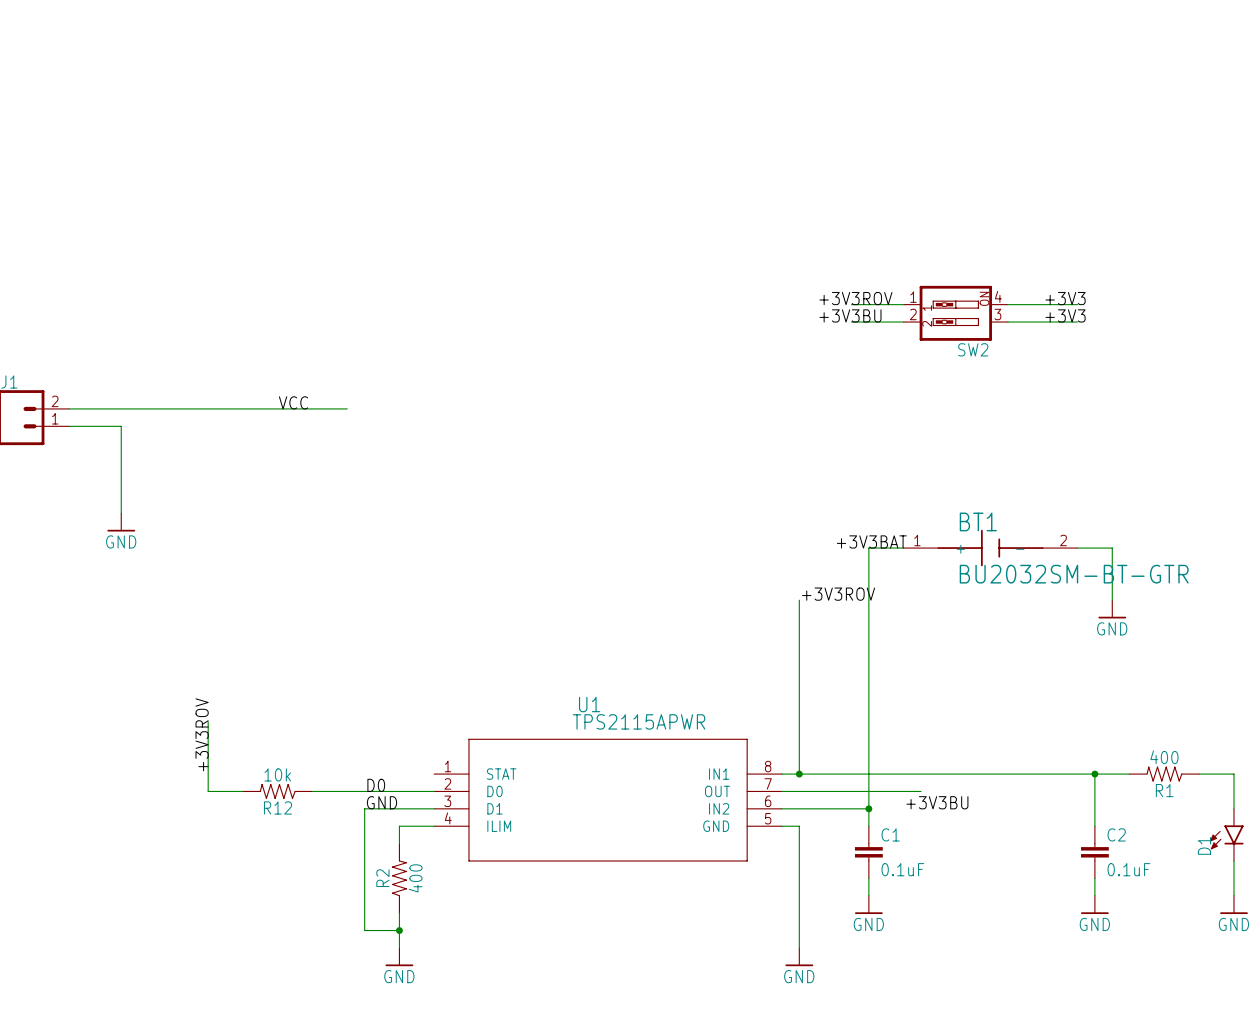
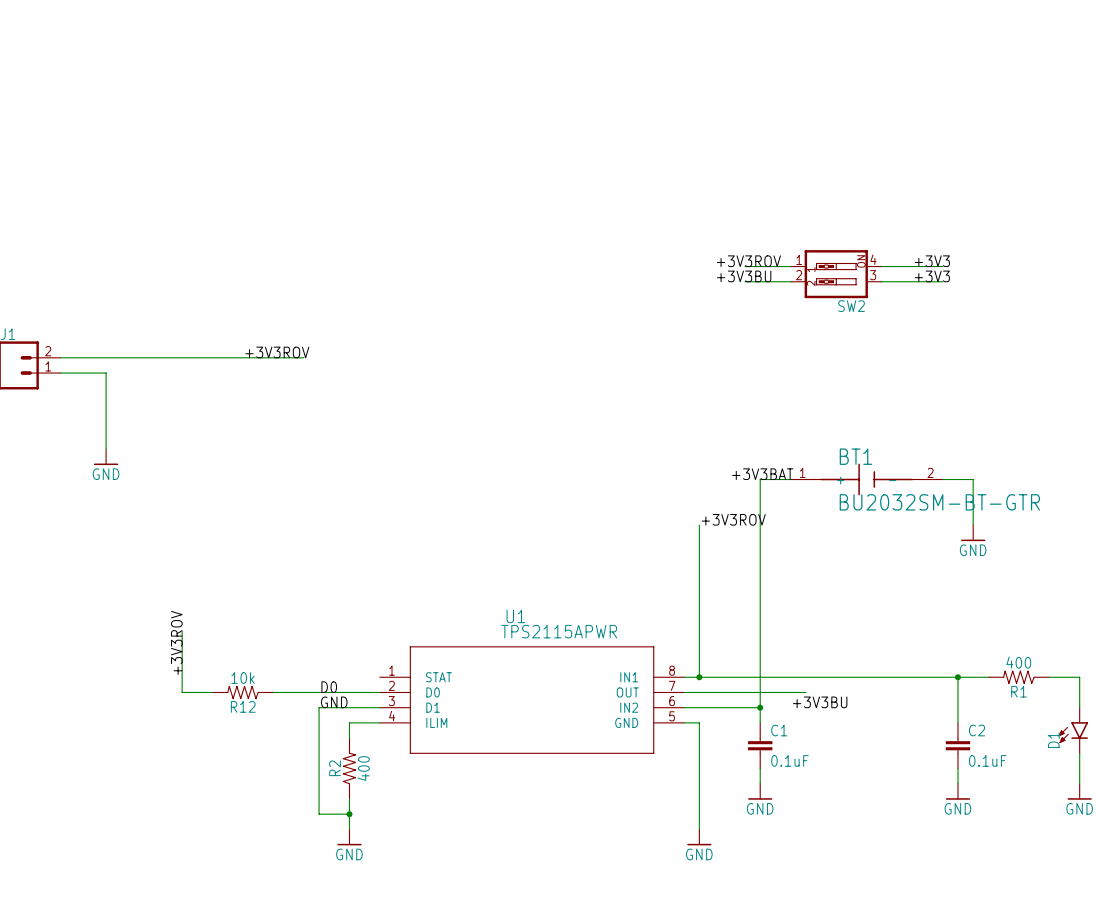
label: VCC (293, 402) -> +3V3ROV (277, 352)

